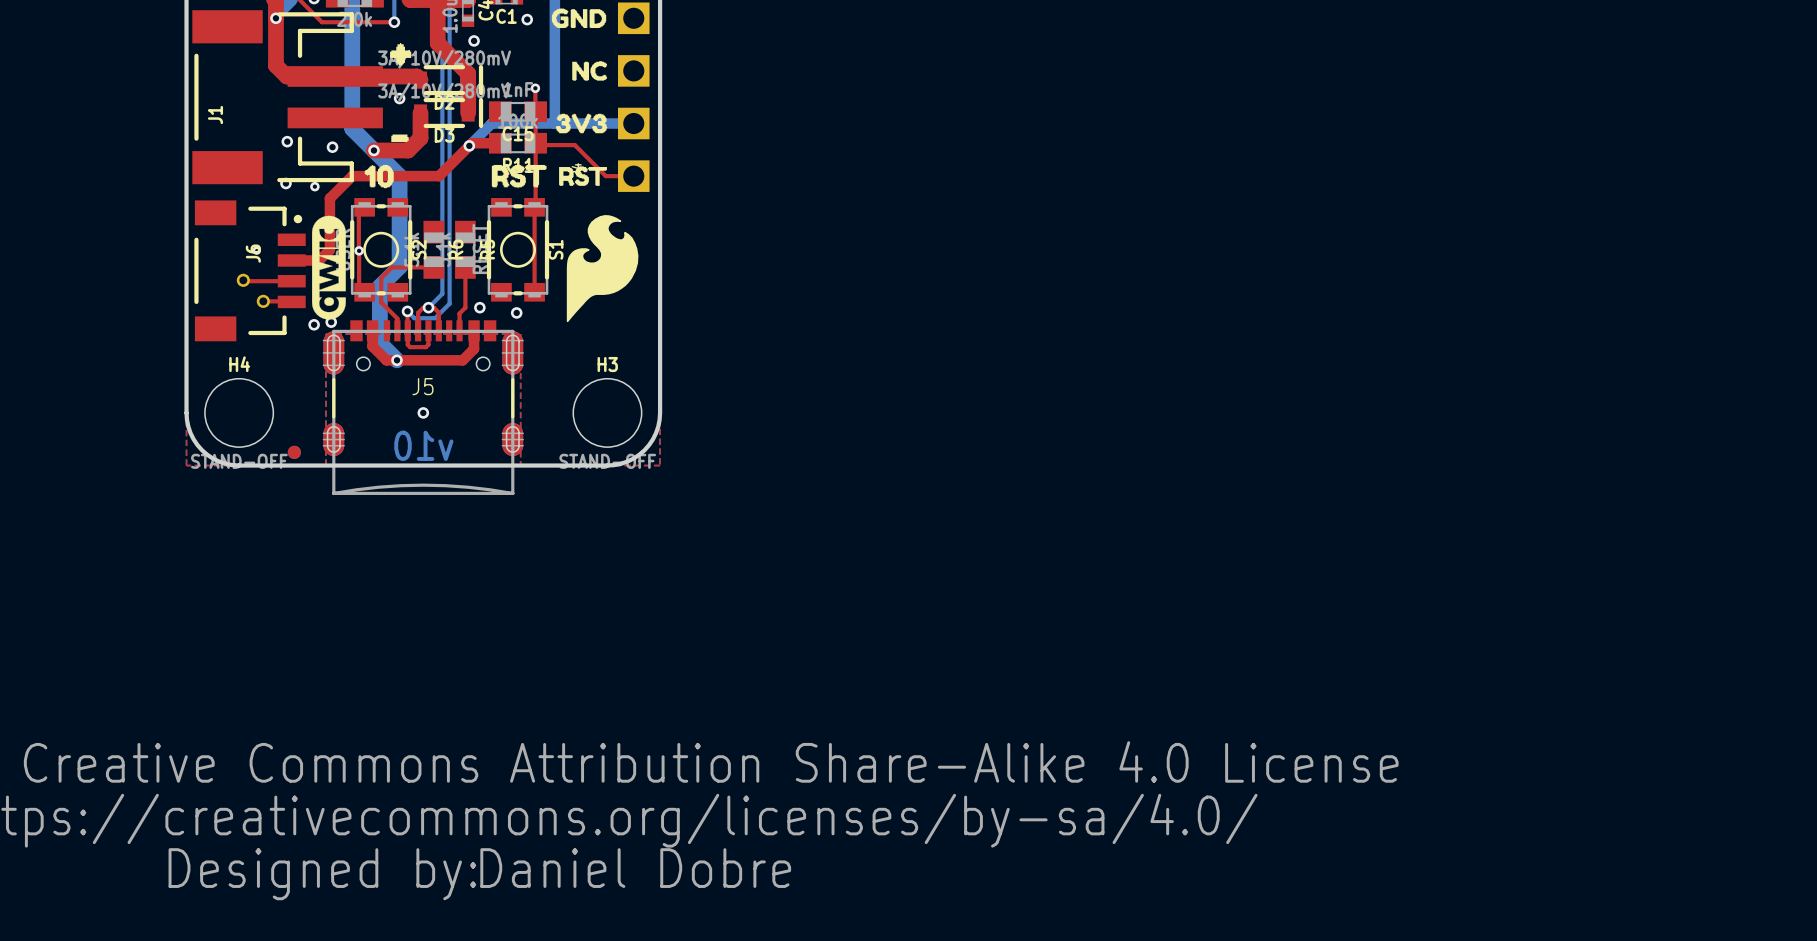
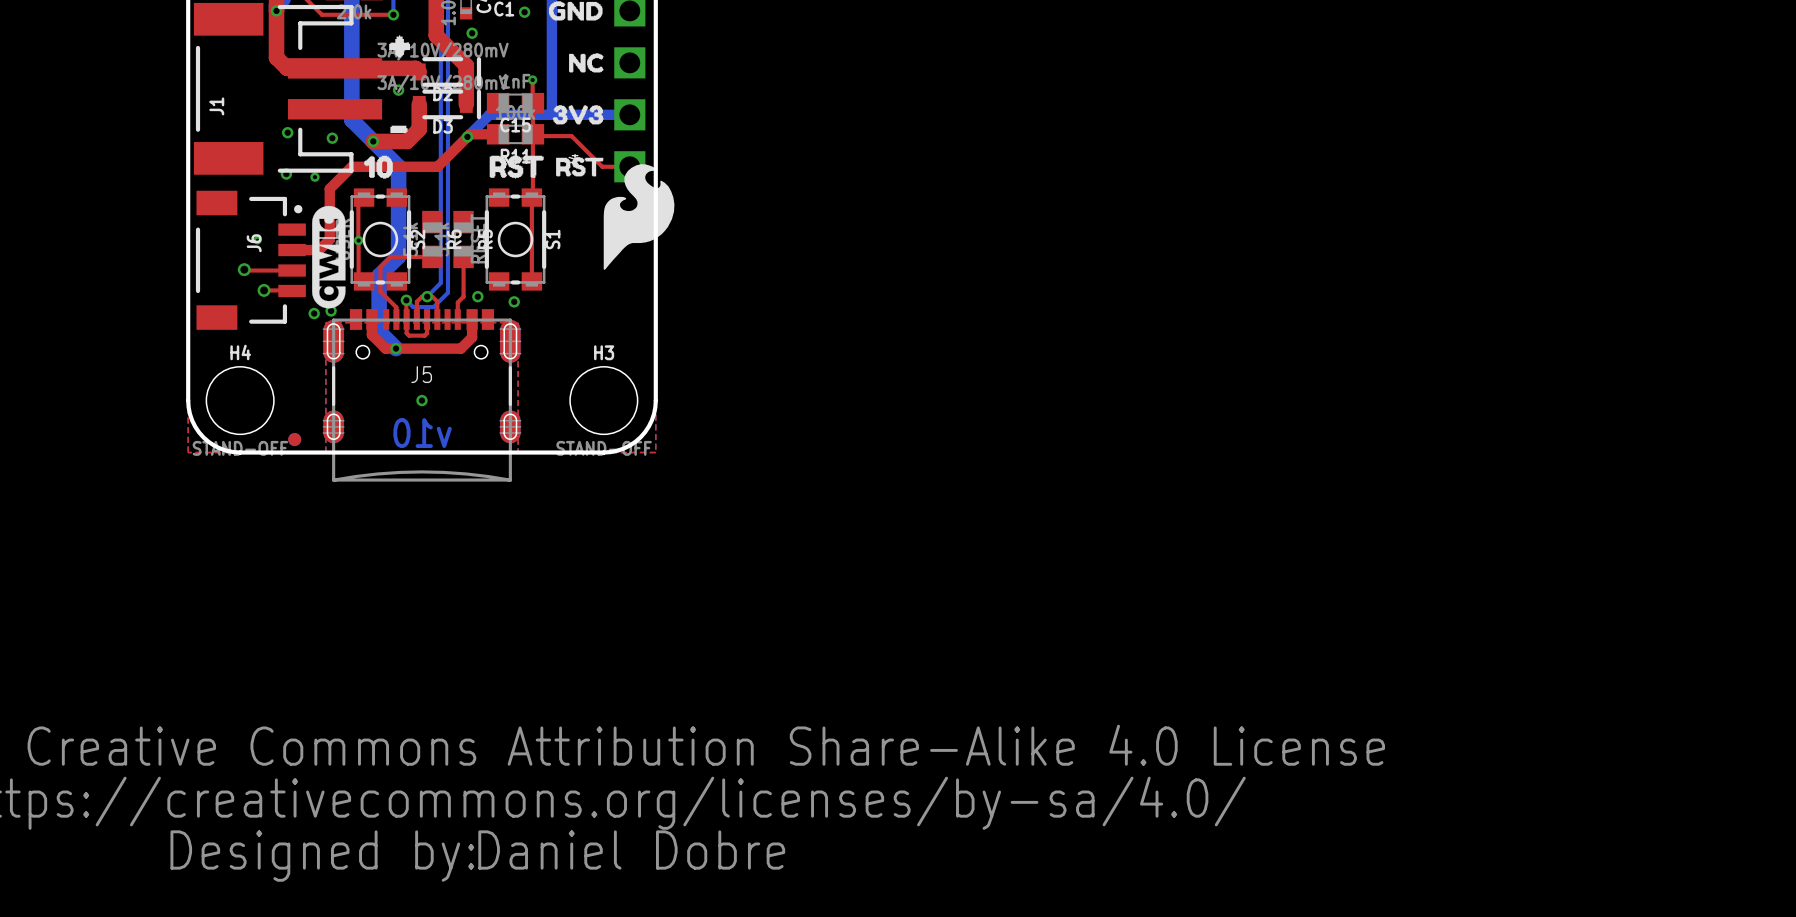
drawing position: (602, 268) -> (639, 217)

